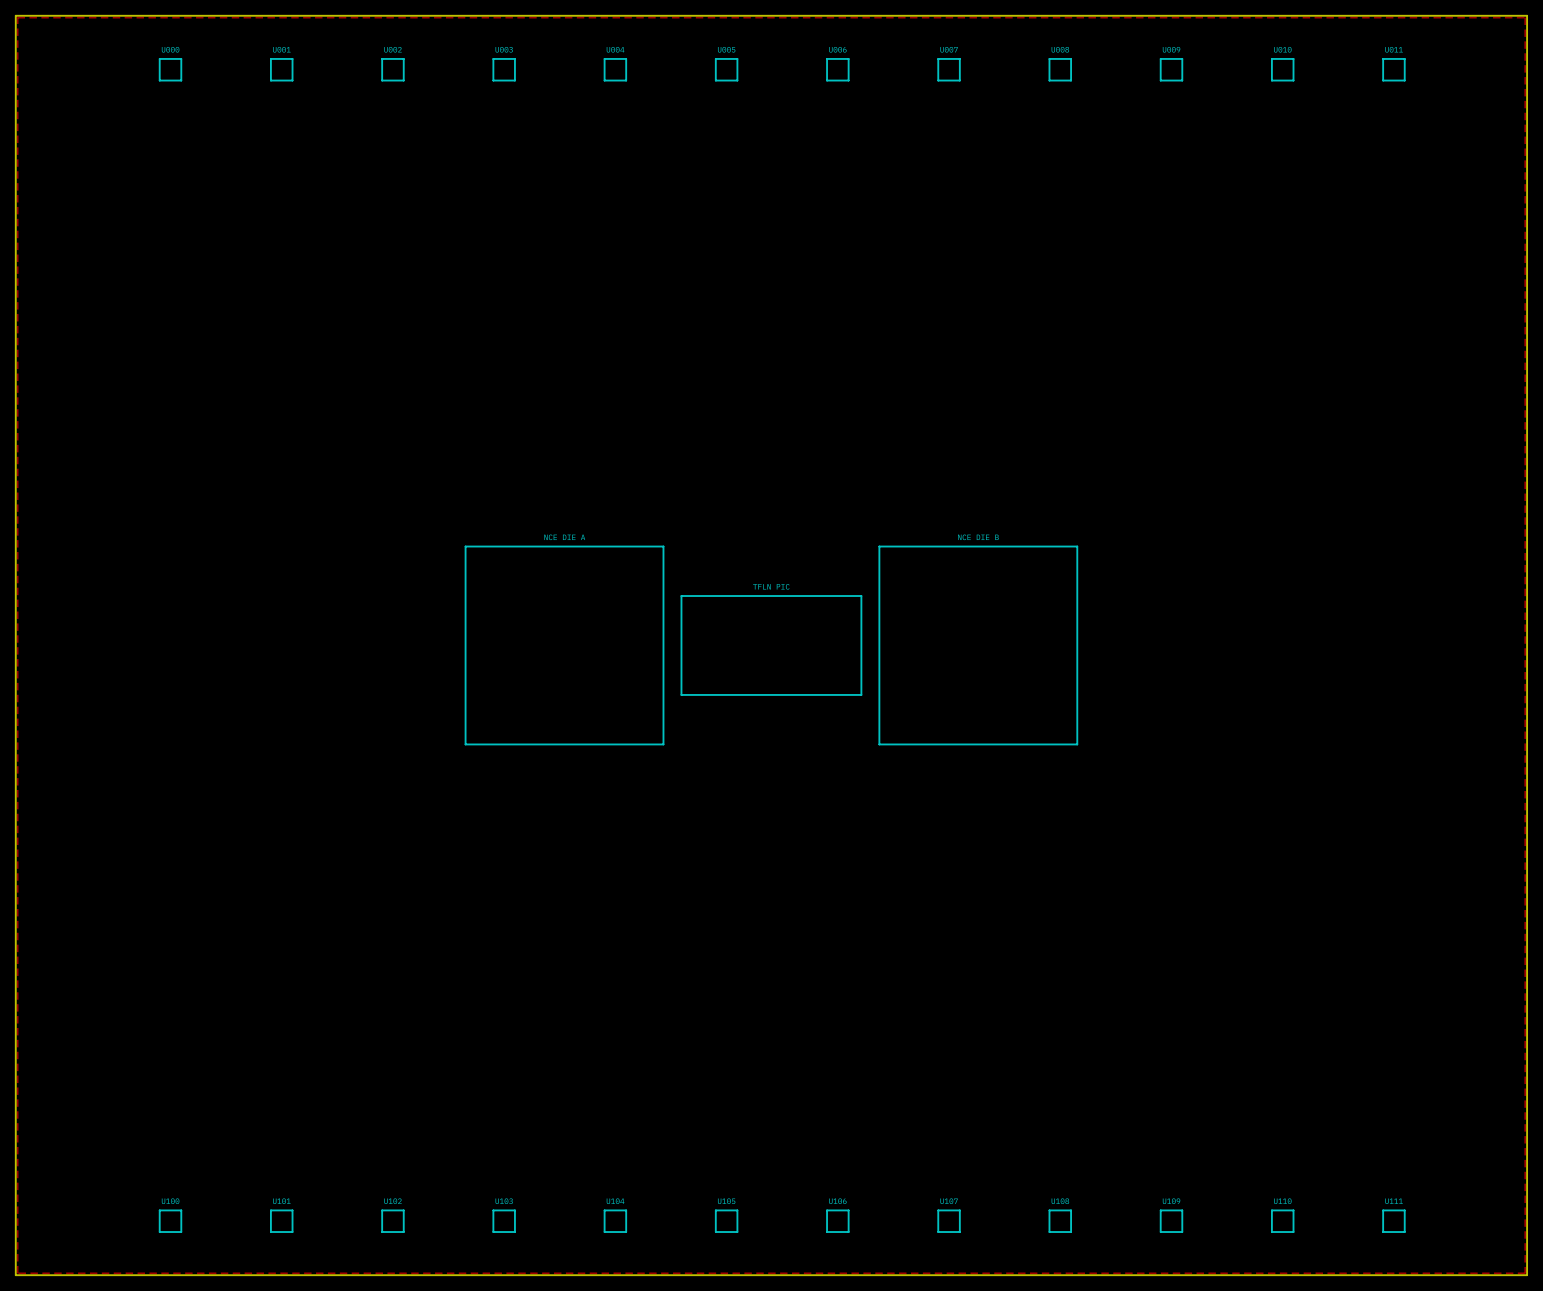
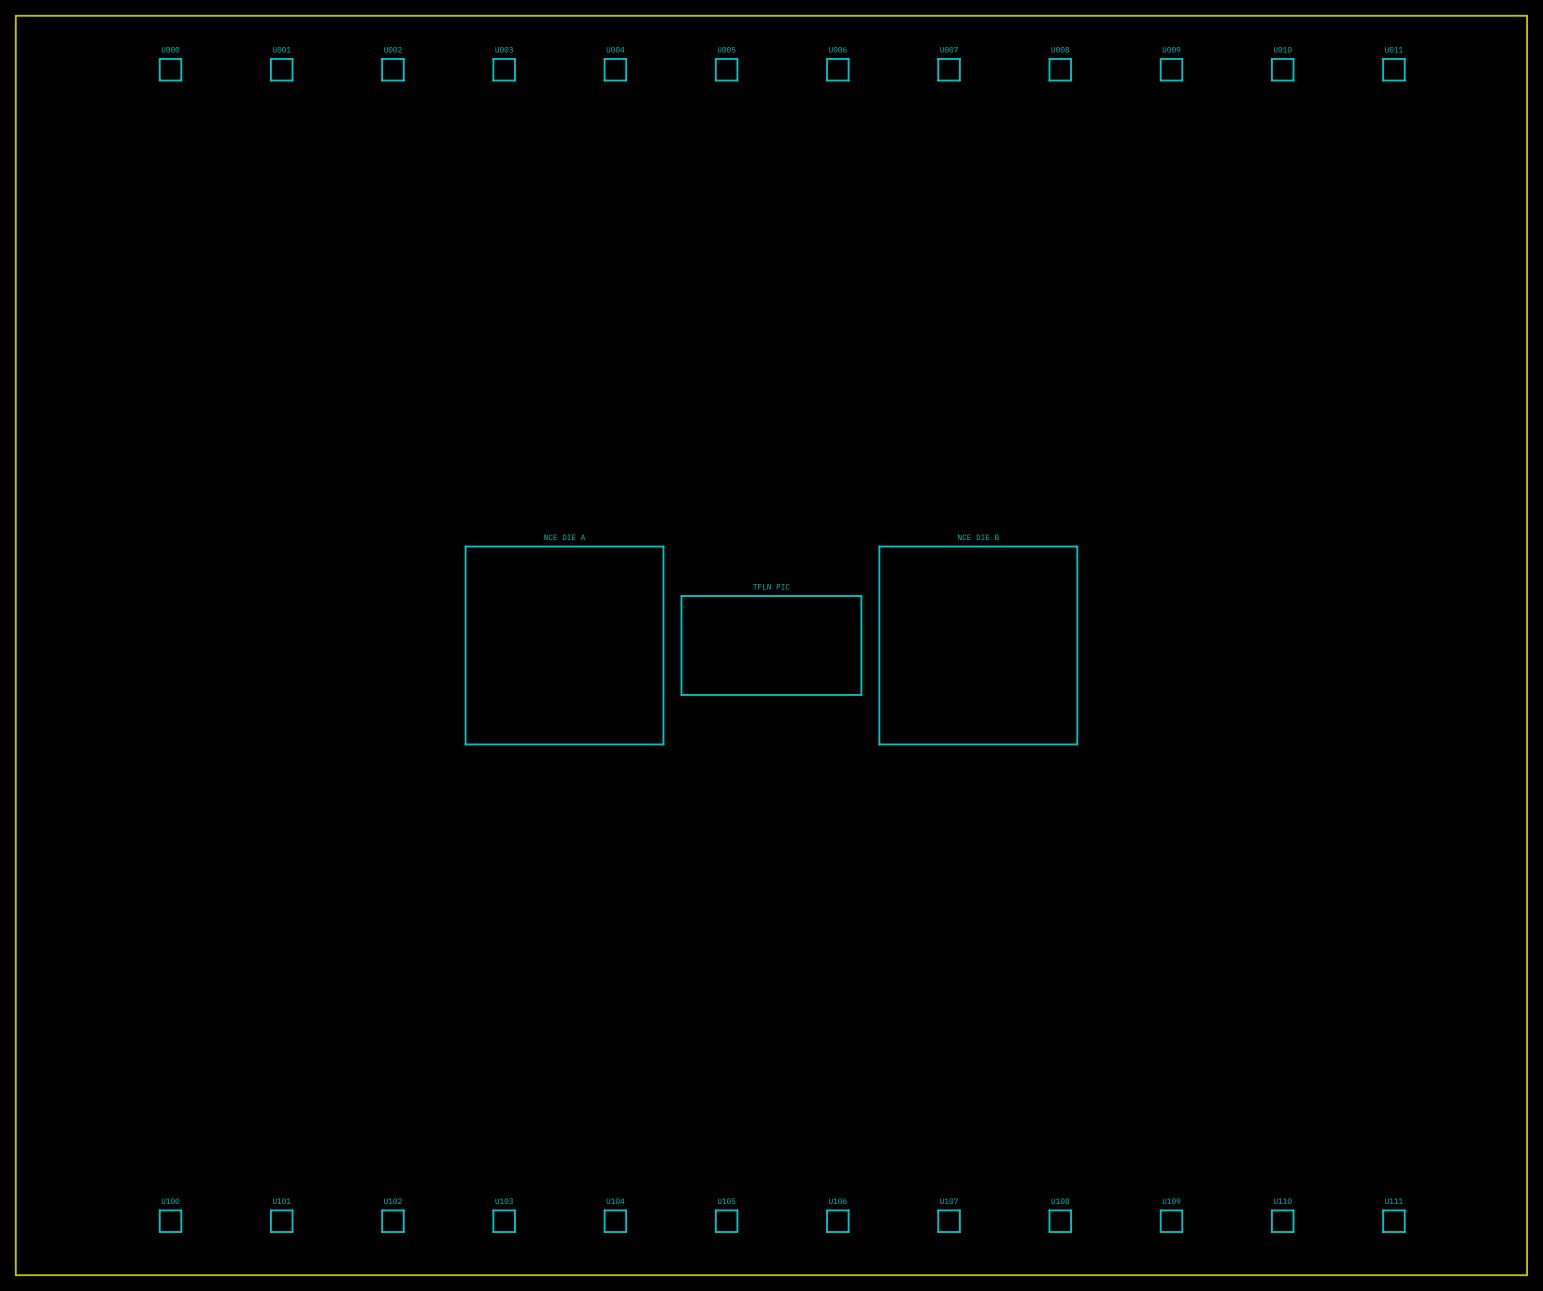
zone outline: (17, 17) (1525, 17) (1525, 1273) (17, 1273) (17, 17) -> none

